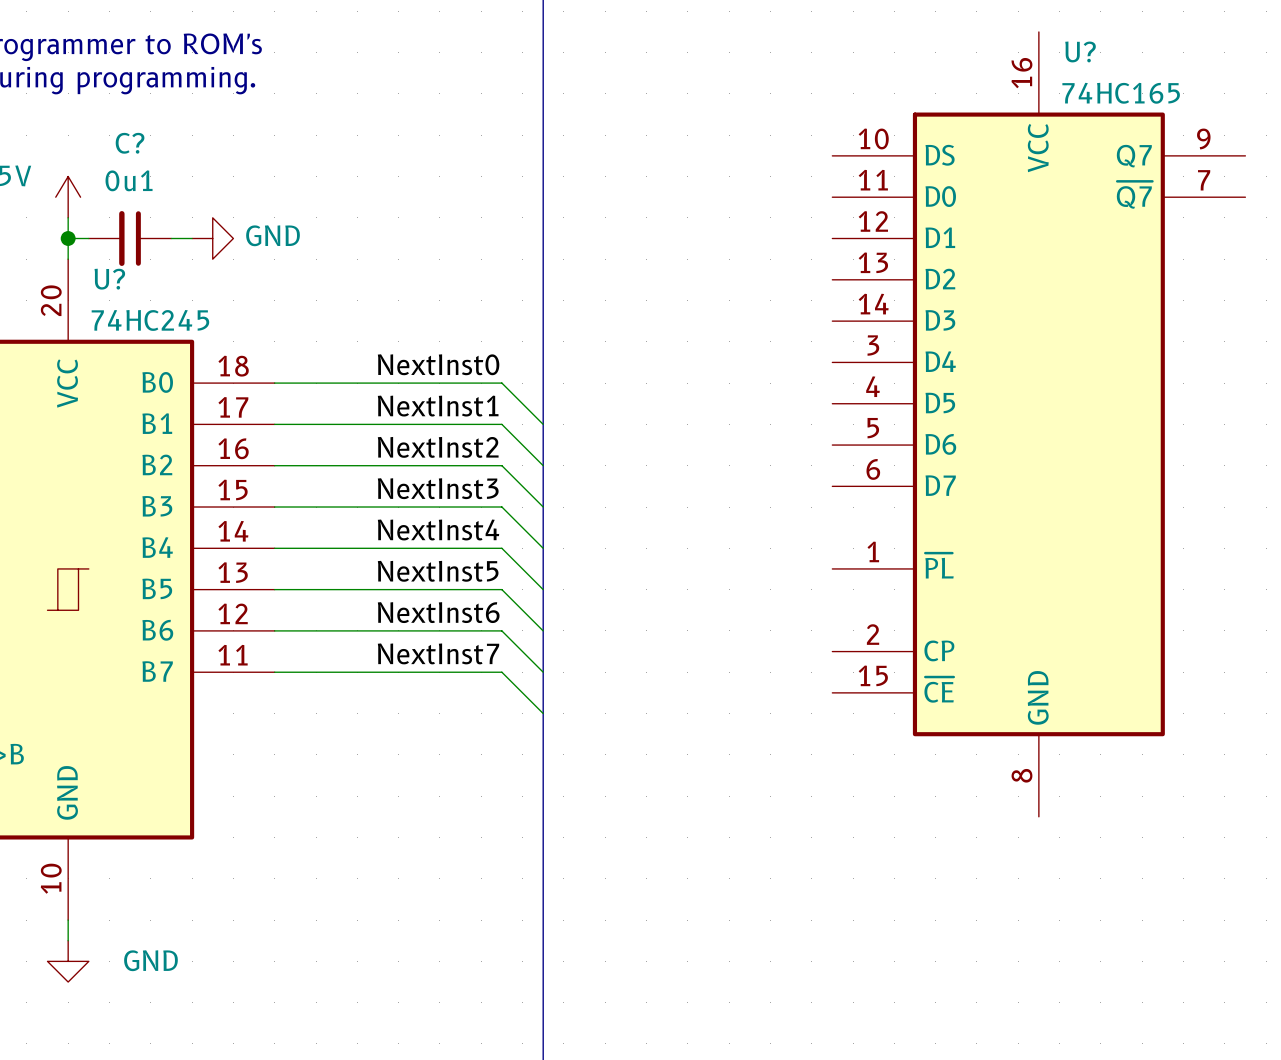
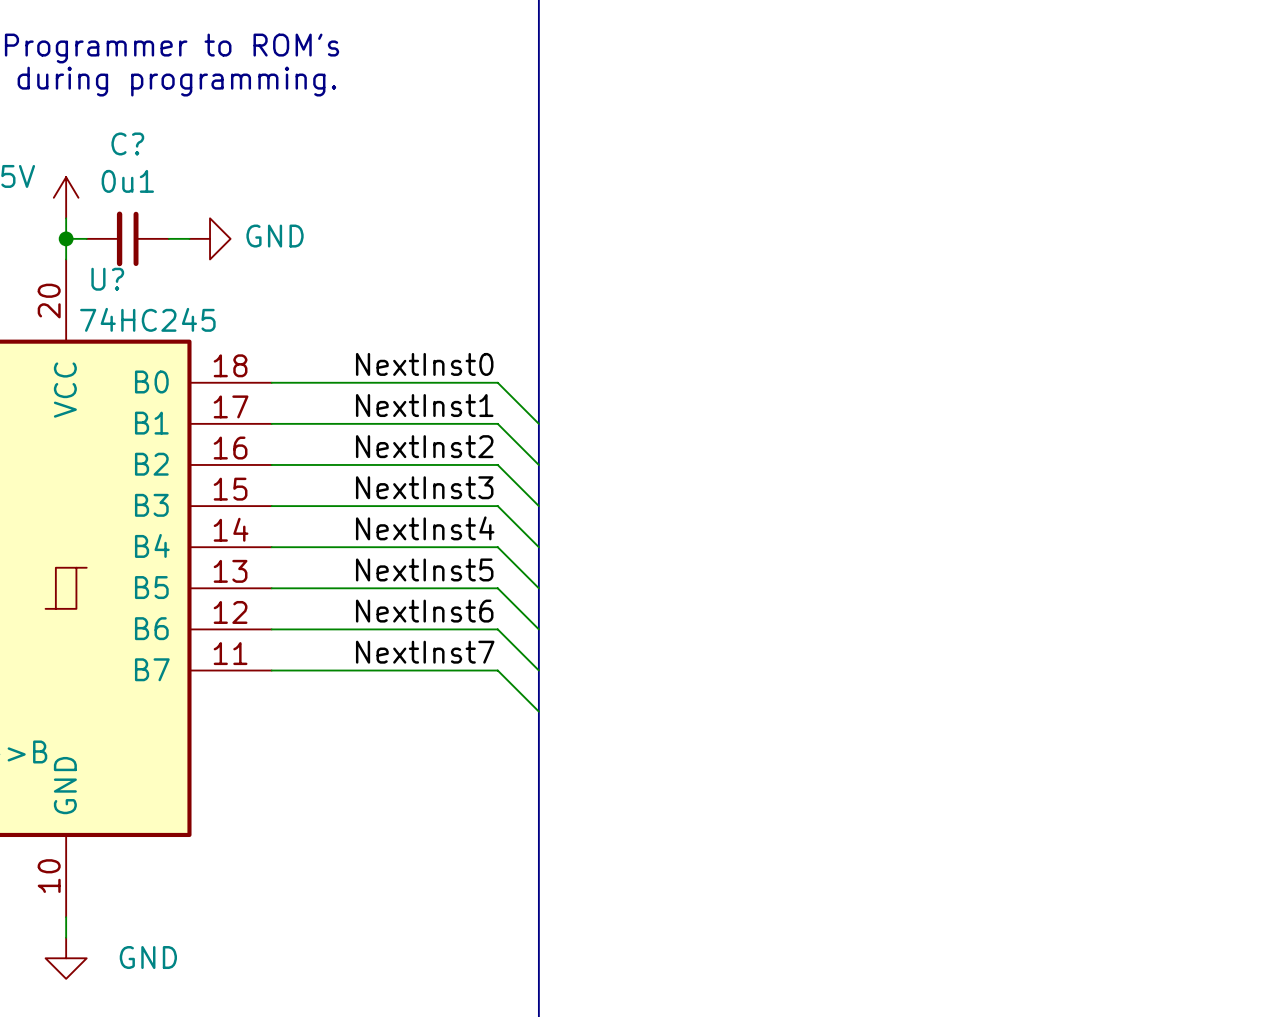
U?: 74HC165 (1038, 424) -> none

